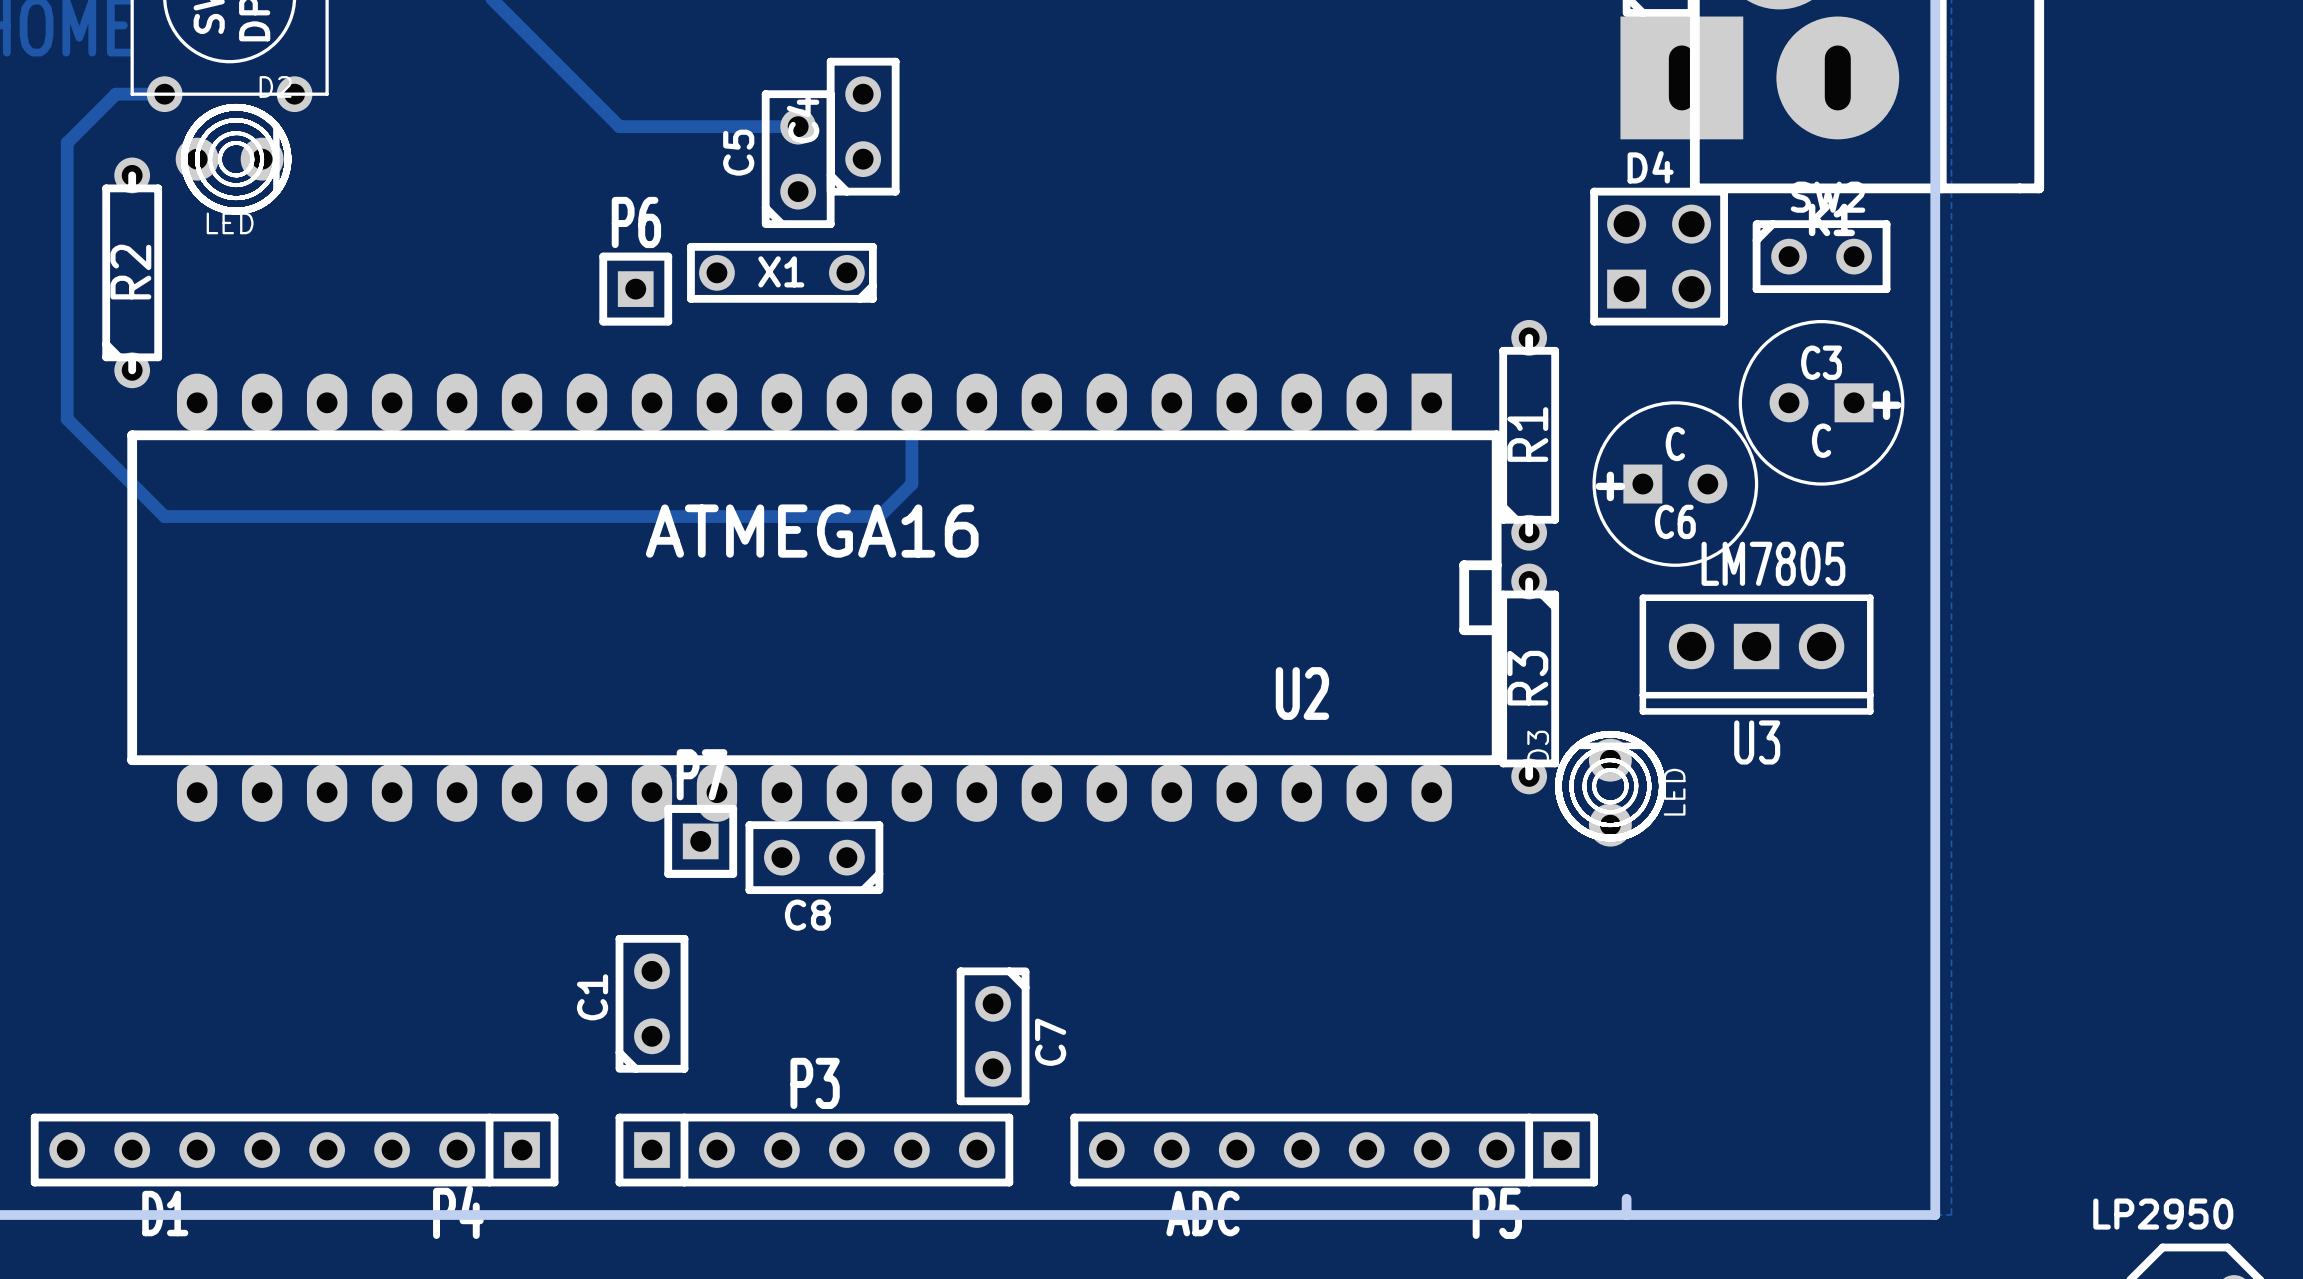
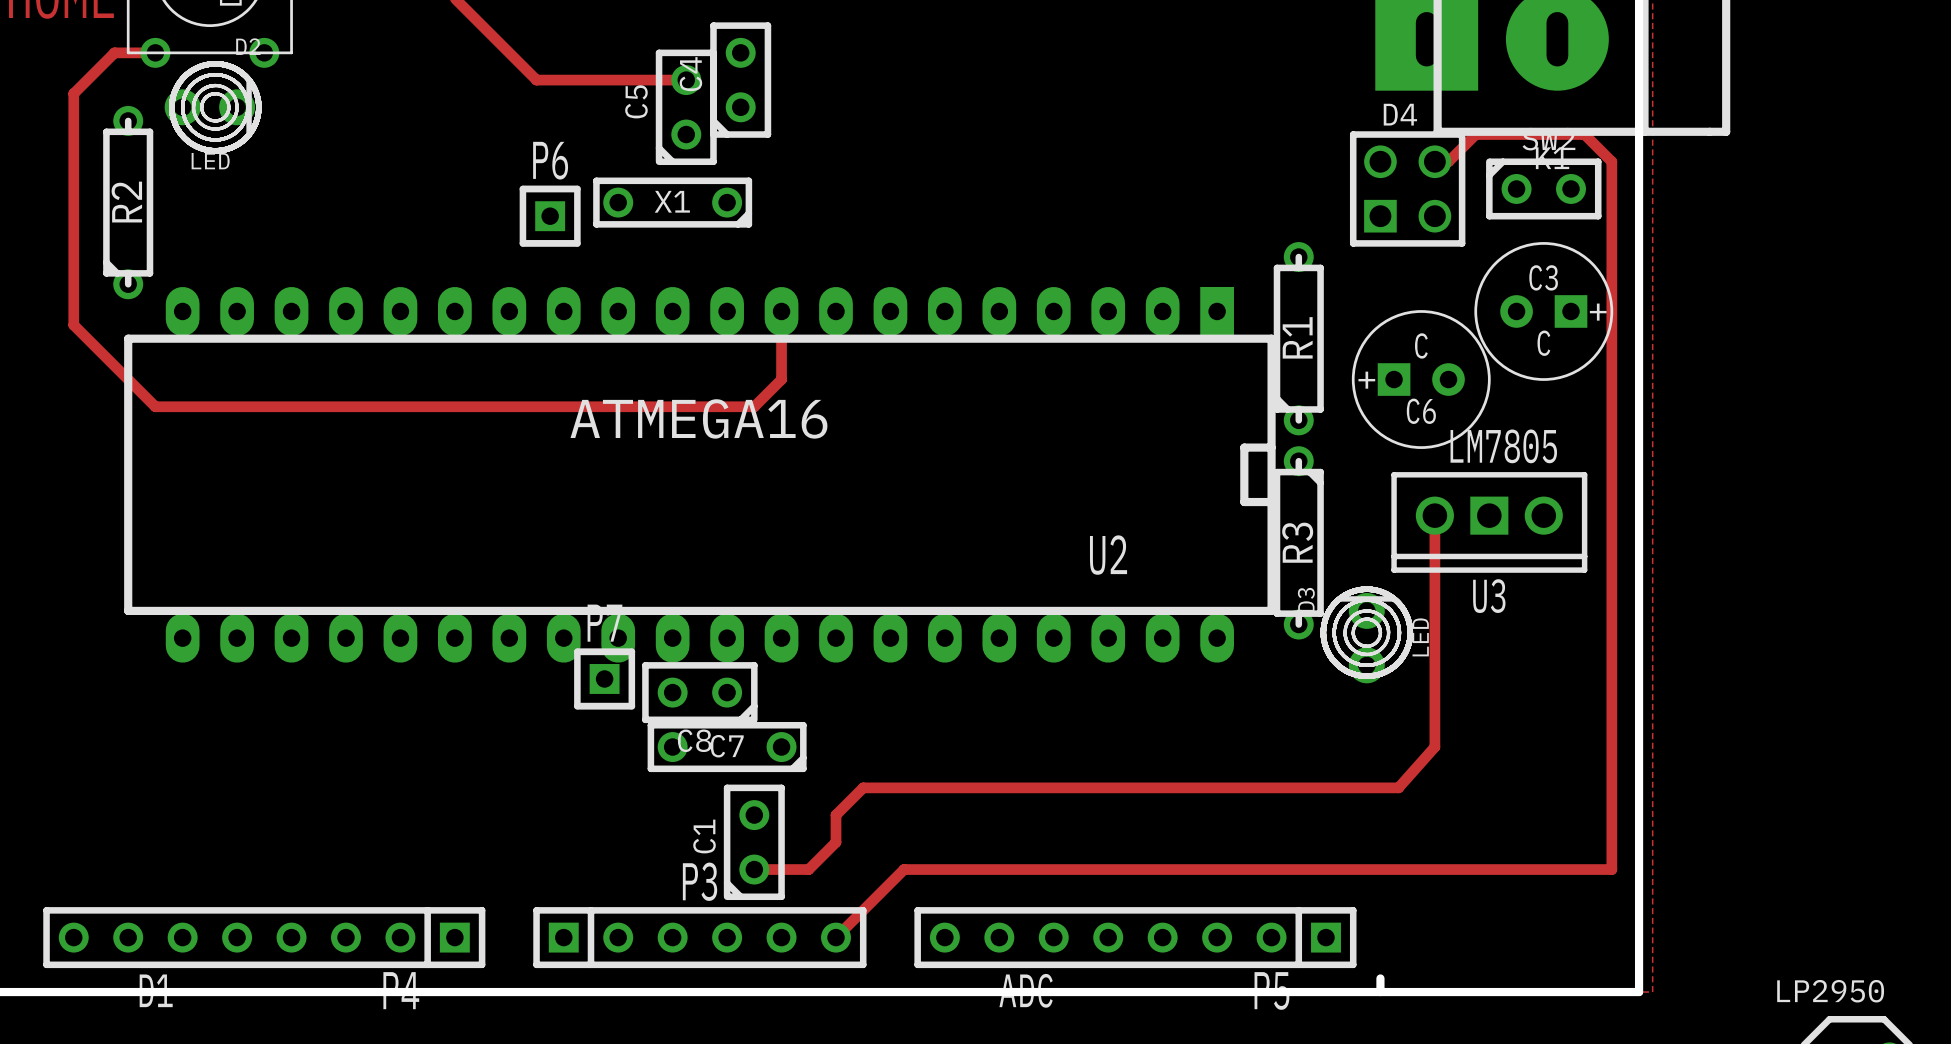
track: none -> (1434, 161) (1448, 161) (1475, 134) (1584, 134) (1611, 161) (1611, 869) (904, 869) (835, 937)
track: none -> (1434, 515) (1434, 747) (1398, 787) (863, 787) (835, 815) (835, 842) (808, 869) (754, 869)
C7 footprint: [956, 967, 1030, 1106] -> [647, 721, 807, 773]
C1 position: (651, 1003) -> (754, 842)
C7 name position: C7 (1050, 1042) -> C7 (727, 746)

